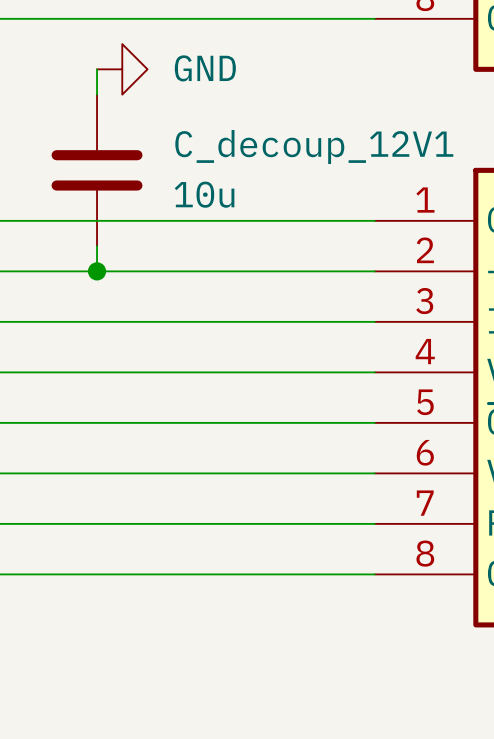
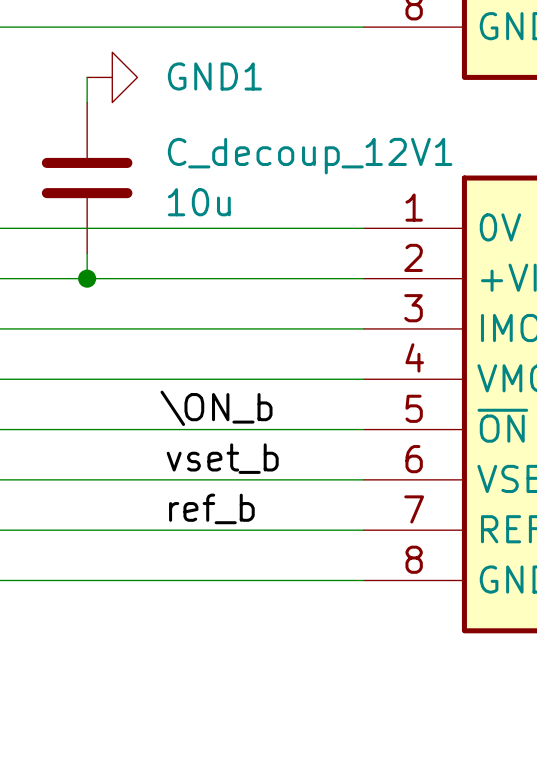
power symbol: GND (122, 69) -> GND1 (112, 77)
label: none -> \ON_b (216, 408)
label: none -> vset_b (222, 458)
label: none -> ref_b (211, 508)

